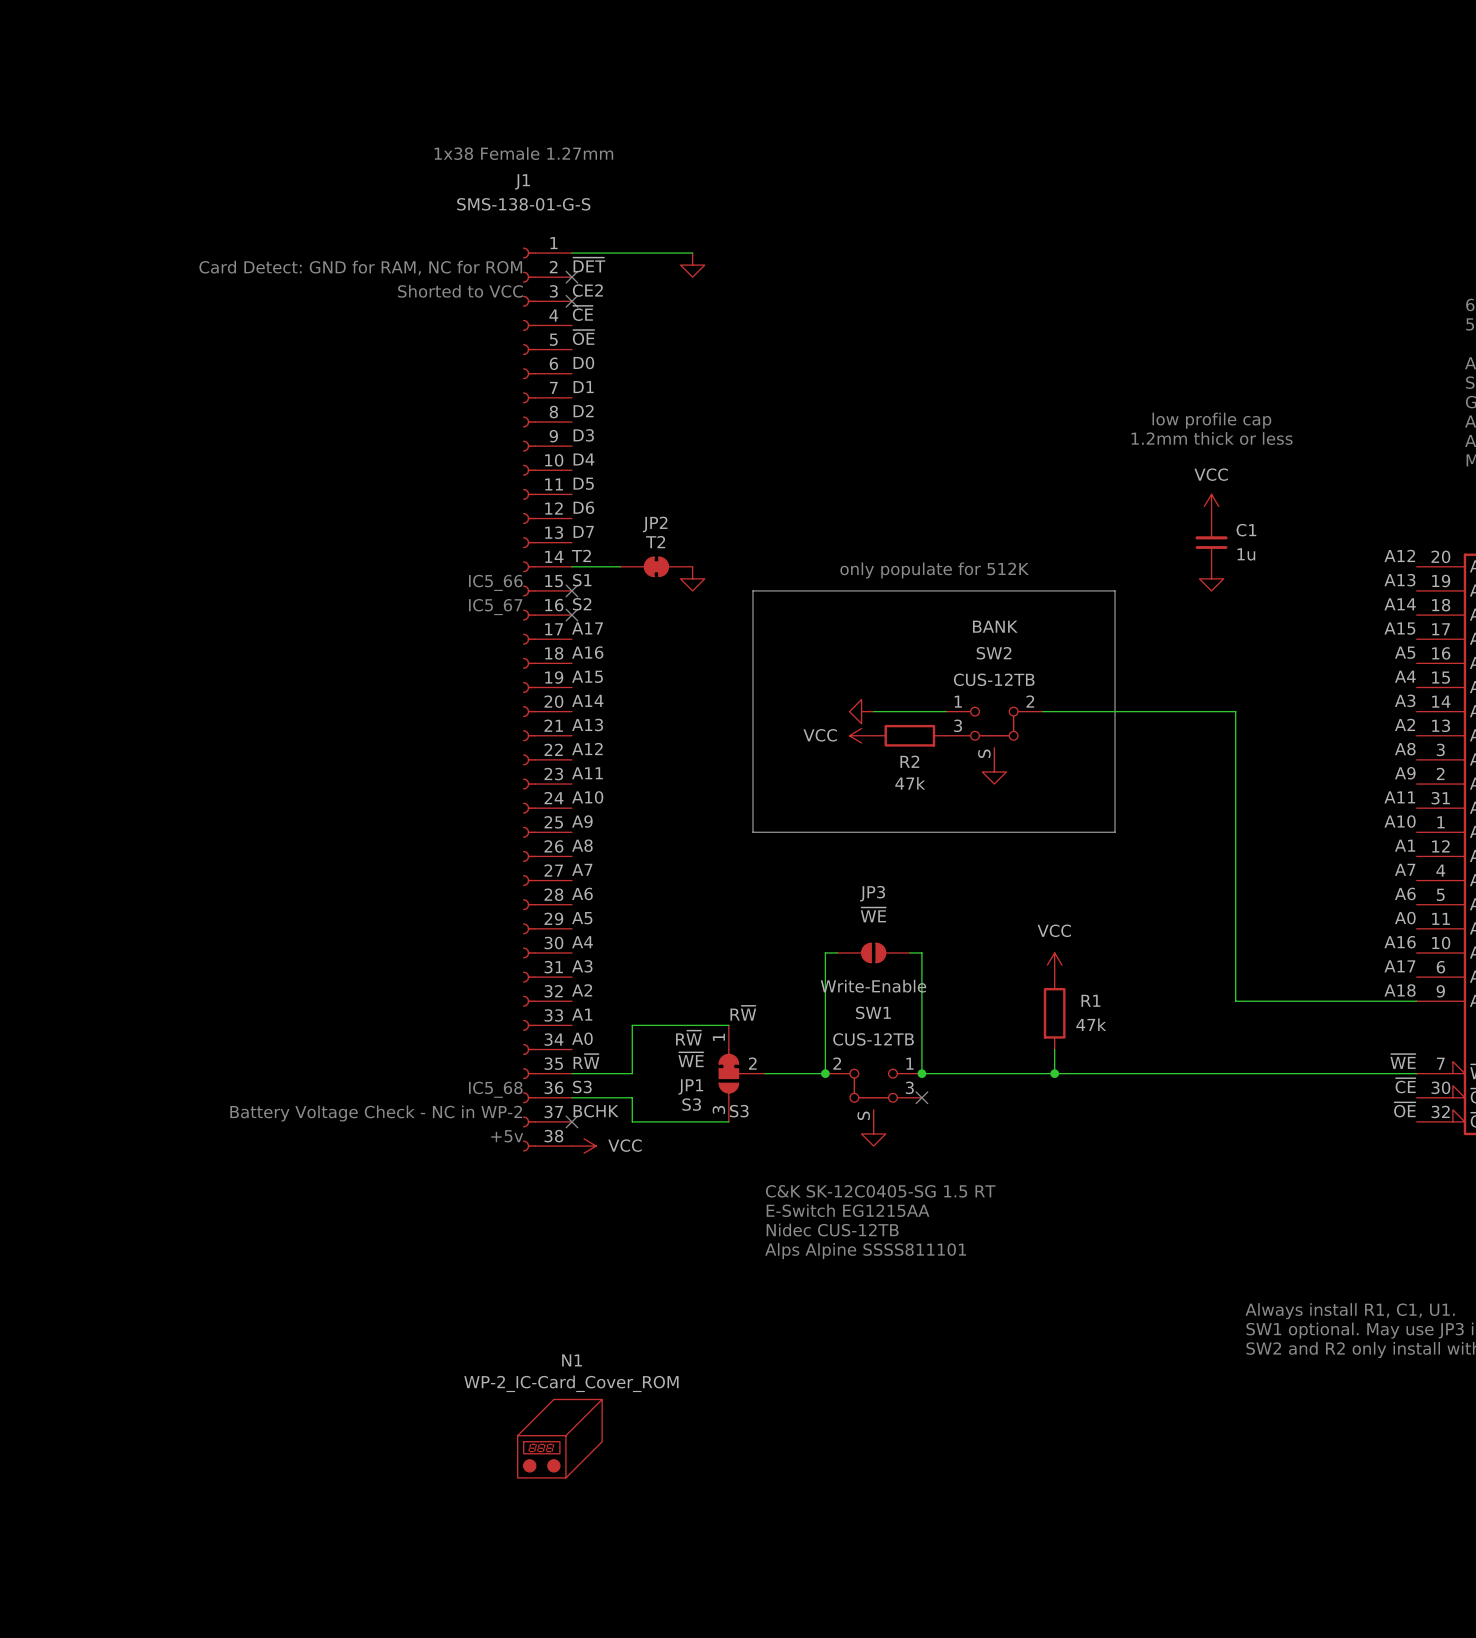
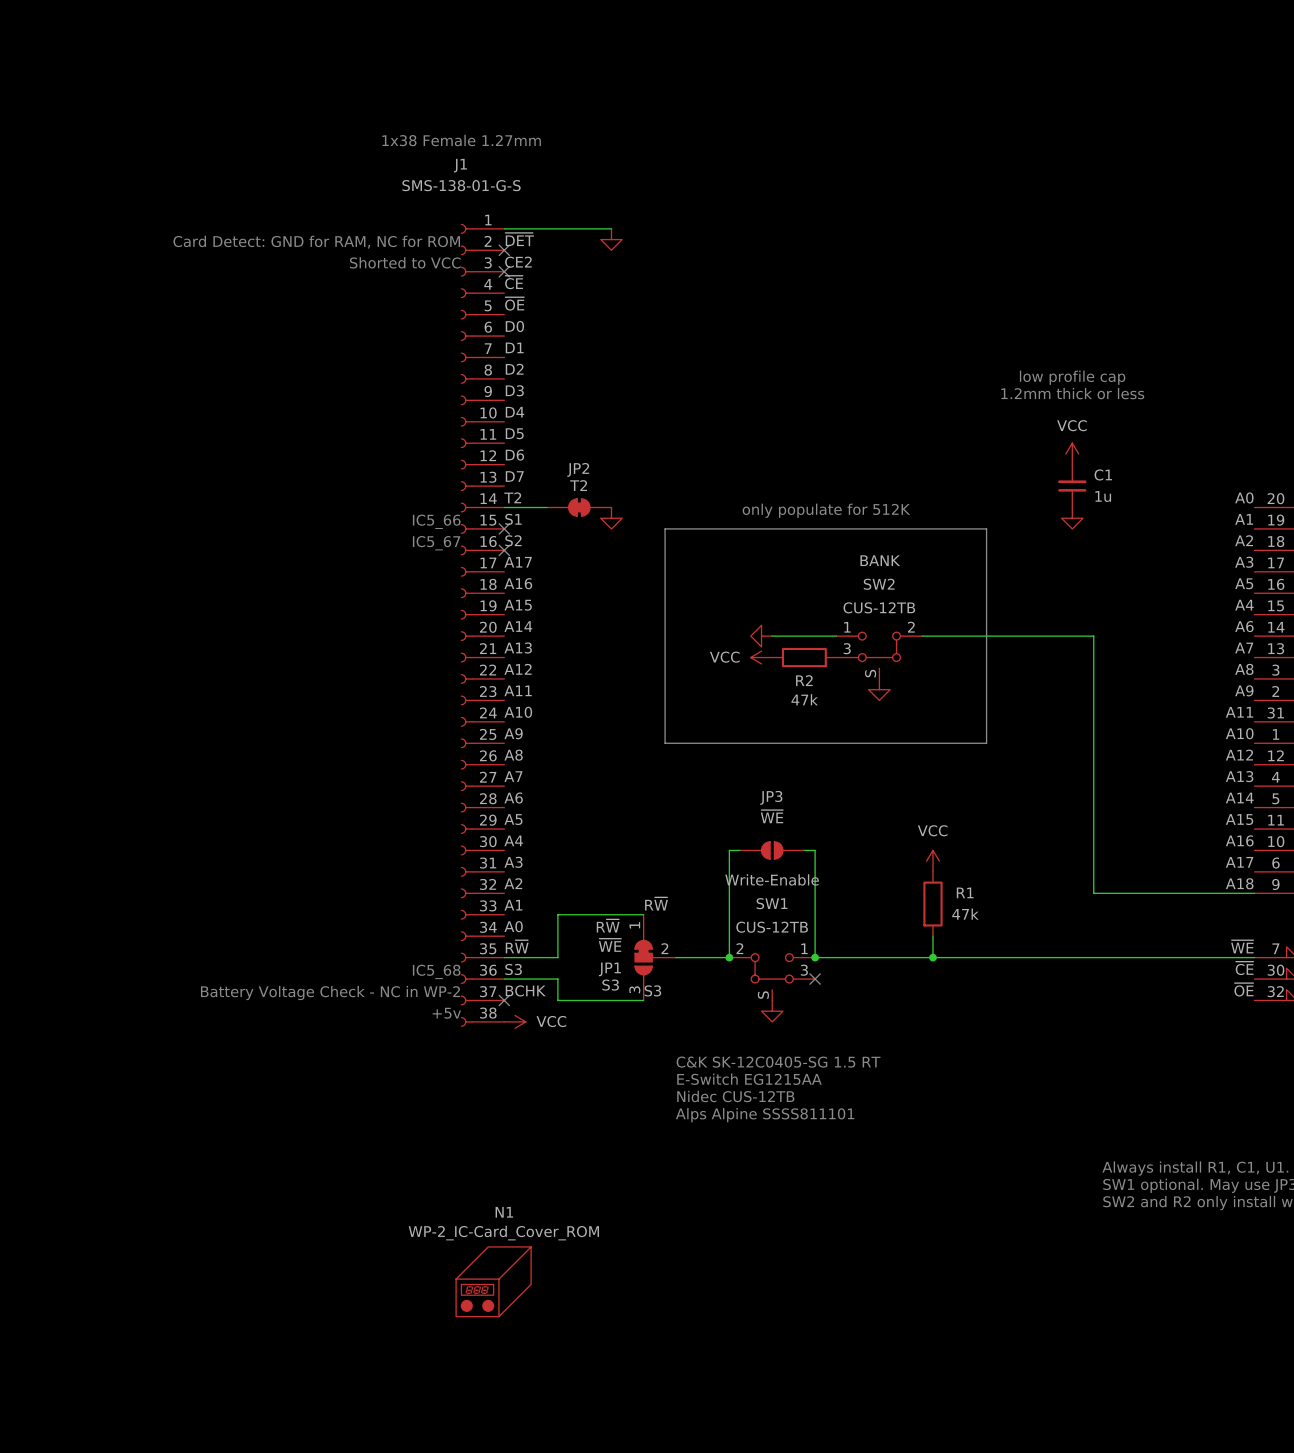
label: A12 (1399, 555) -> A0 (1244, 497)
label: A13 (1399, 580) -> A1 (1244, 519)
label: A14 (1400, 604) -> A2 (1244, 540)
label: A15 (1399, 628) -> A3 (1244, 562)
label: A3 (1405, 700) -> A6 (1244, 626)
label: A2 (1405, 724) -> A7 (1244, 647)
label: A1 (1405, 845) -> A12 (1239, 755)
label: A7 (1405, 869) -> A13 (1239, 776)
label: A6 (1405, 893) -> A14 (1239, 798)
label: A0 (1405, 918) -> A15 (1239, 819)

